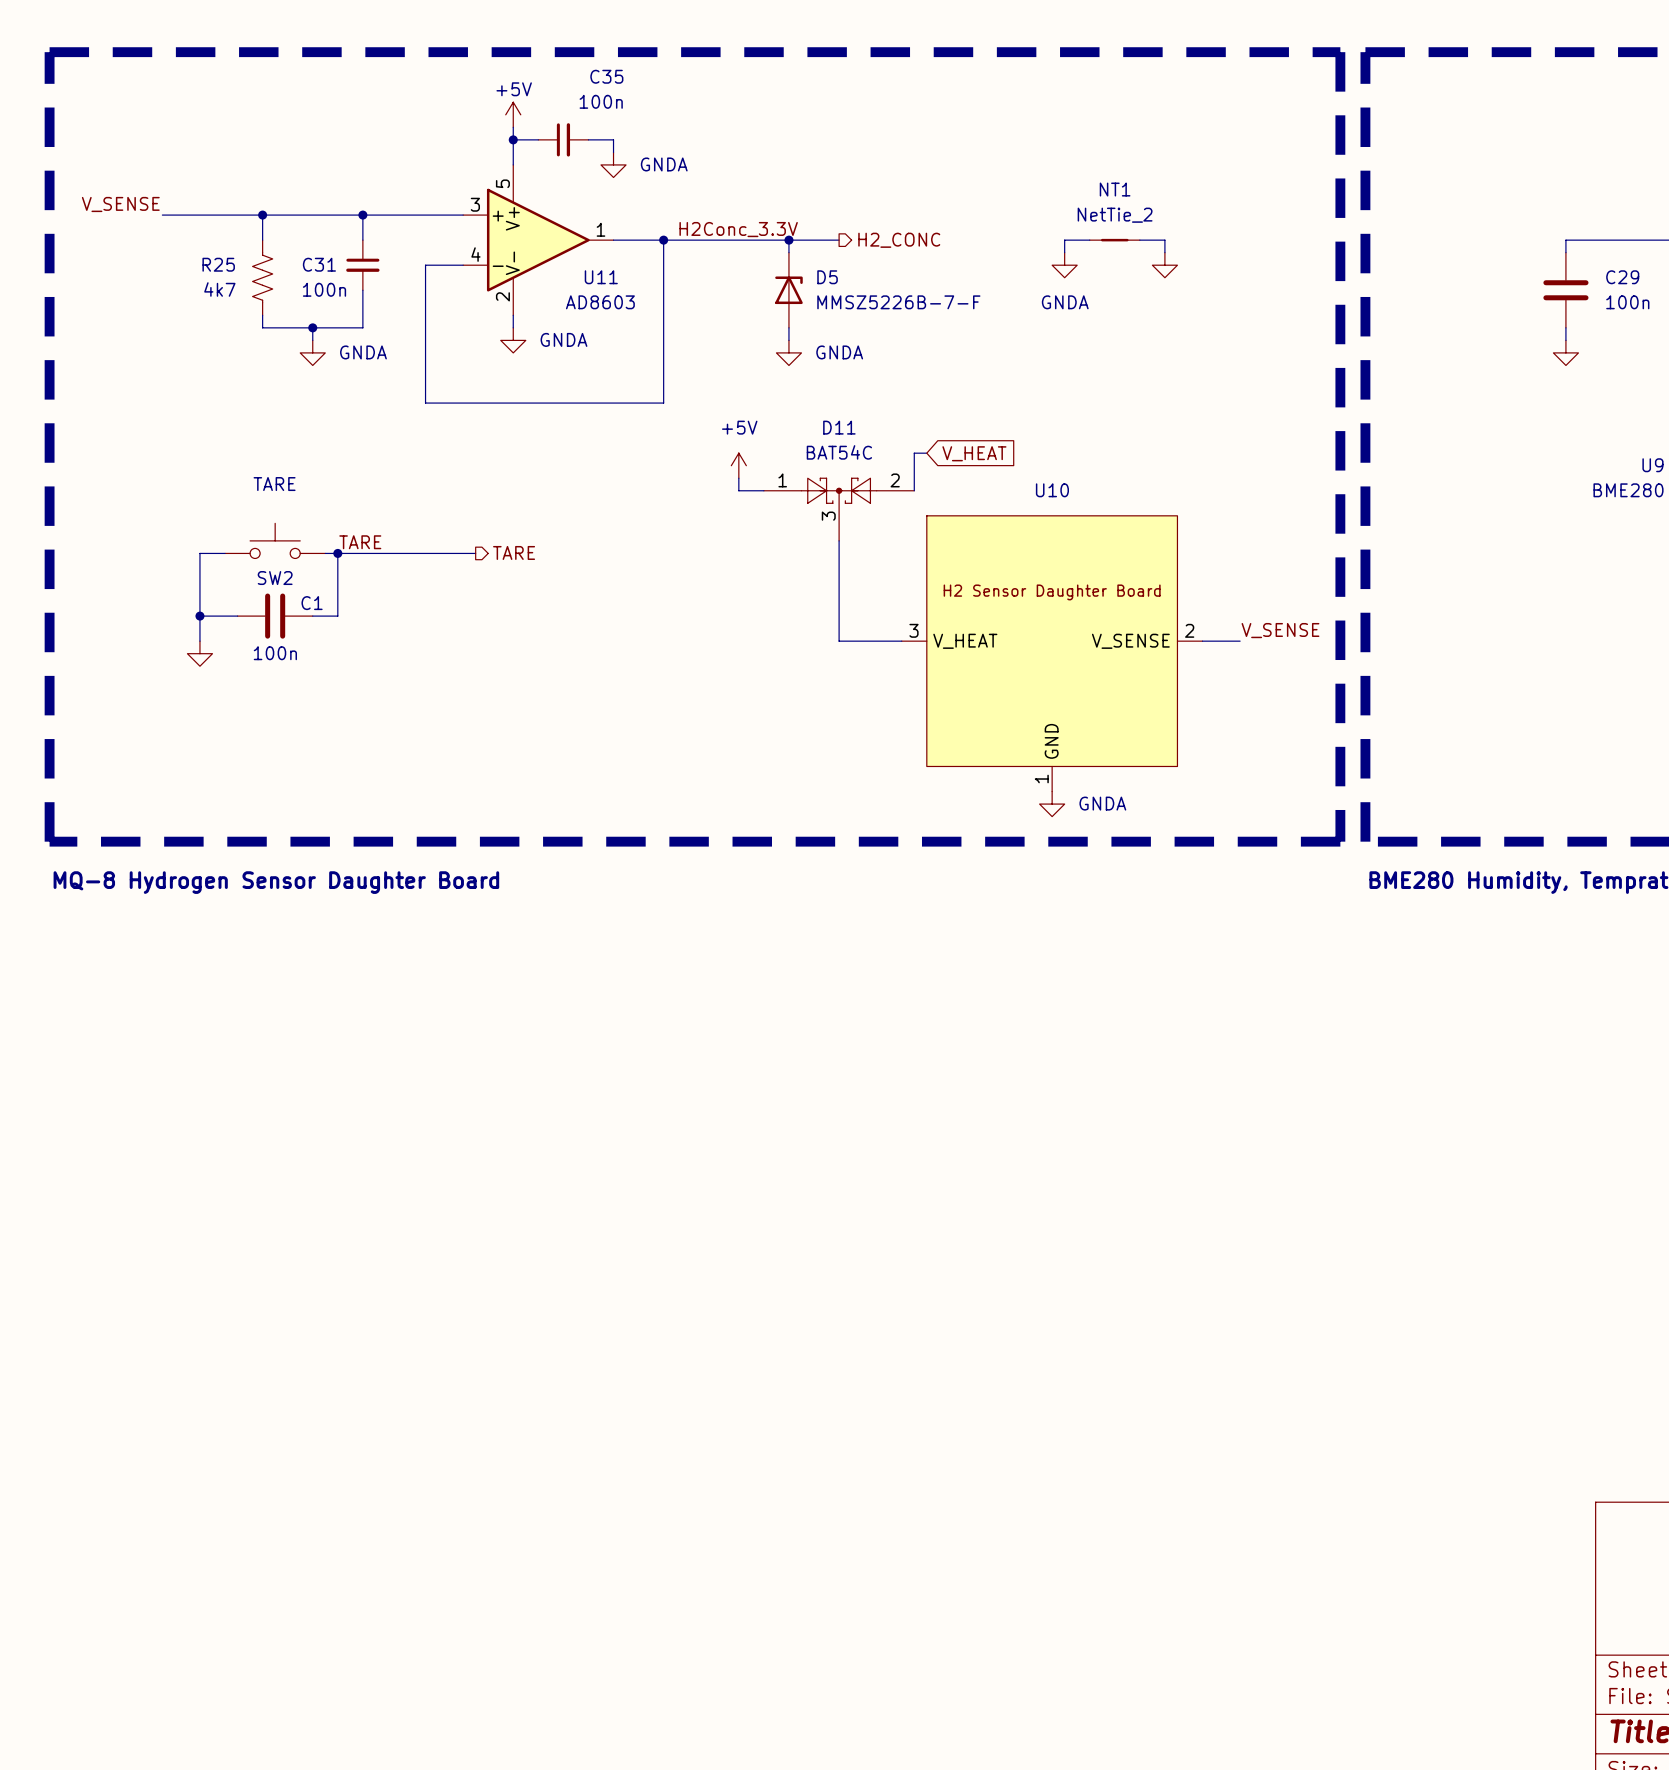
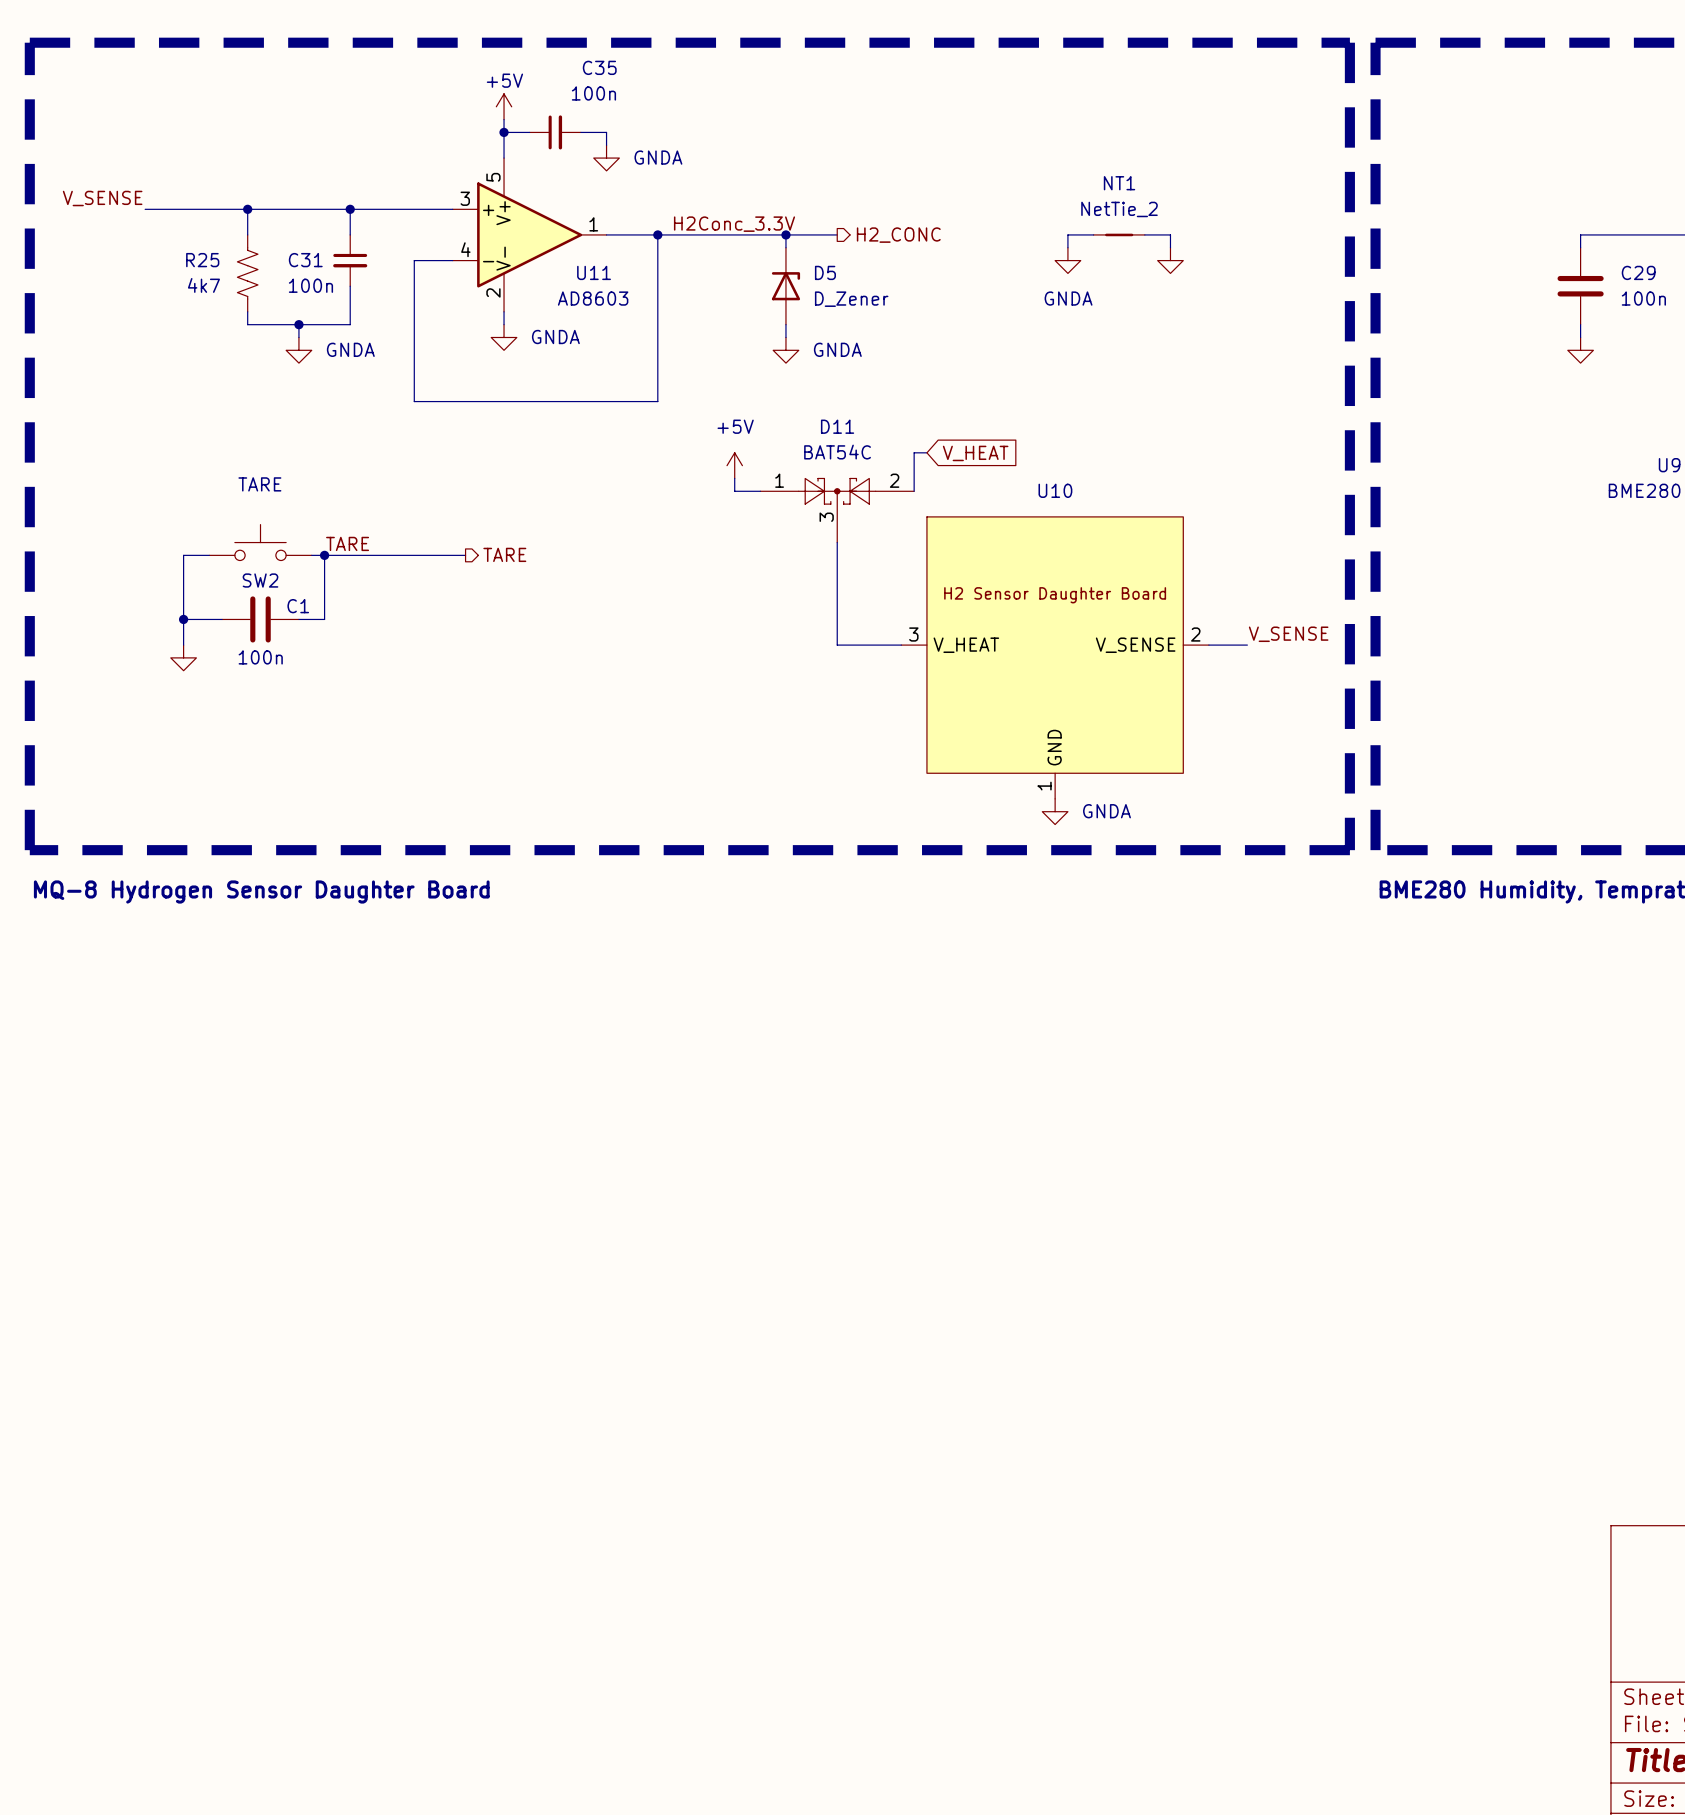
D5 value: MMSZ5226B-7-F (898, 302) -> D_Zener (851, 299)

